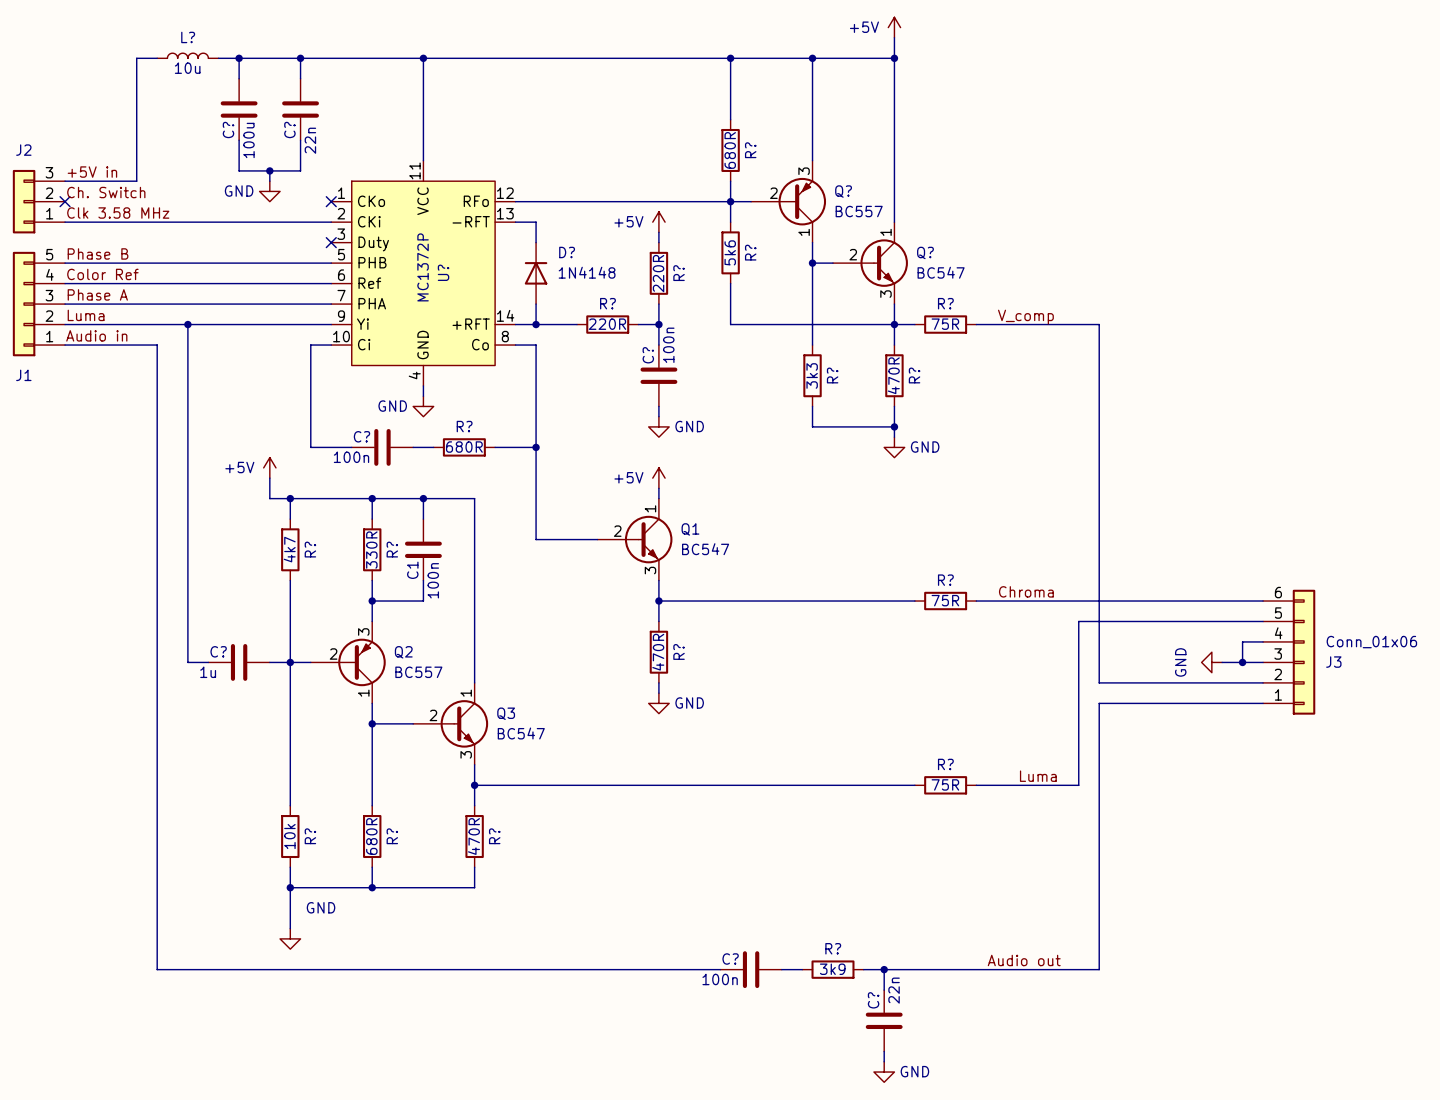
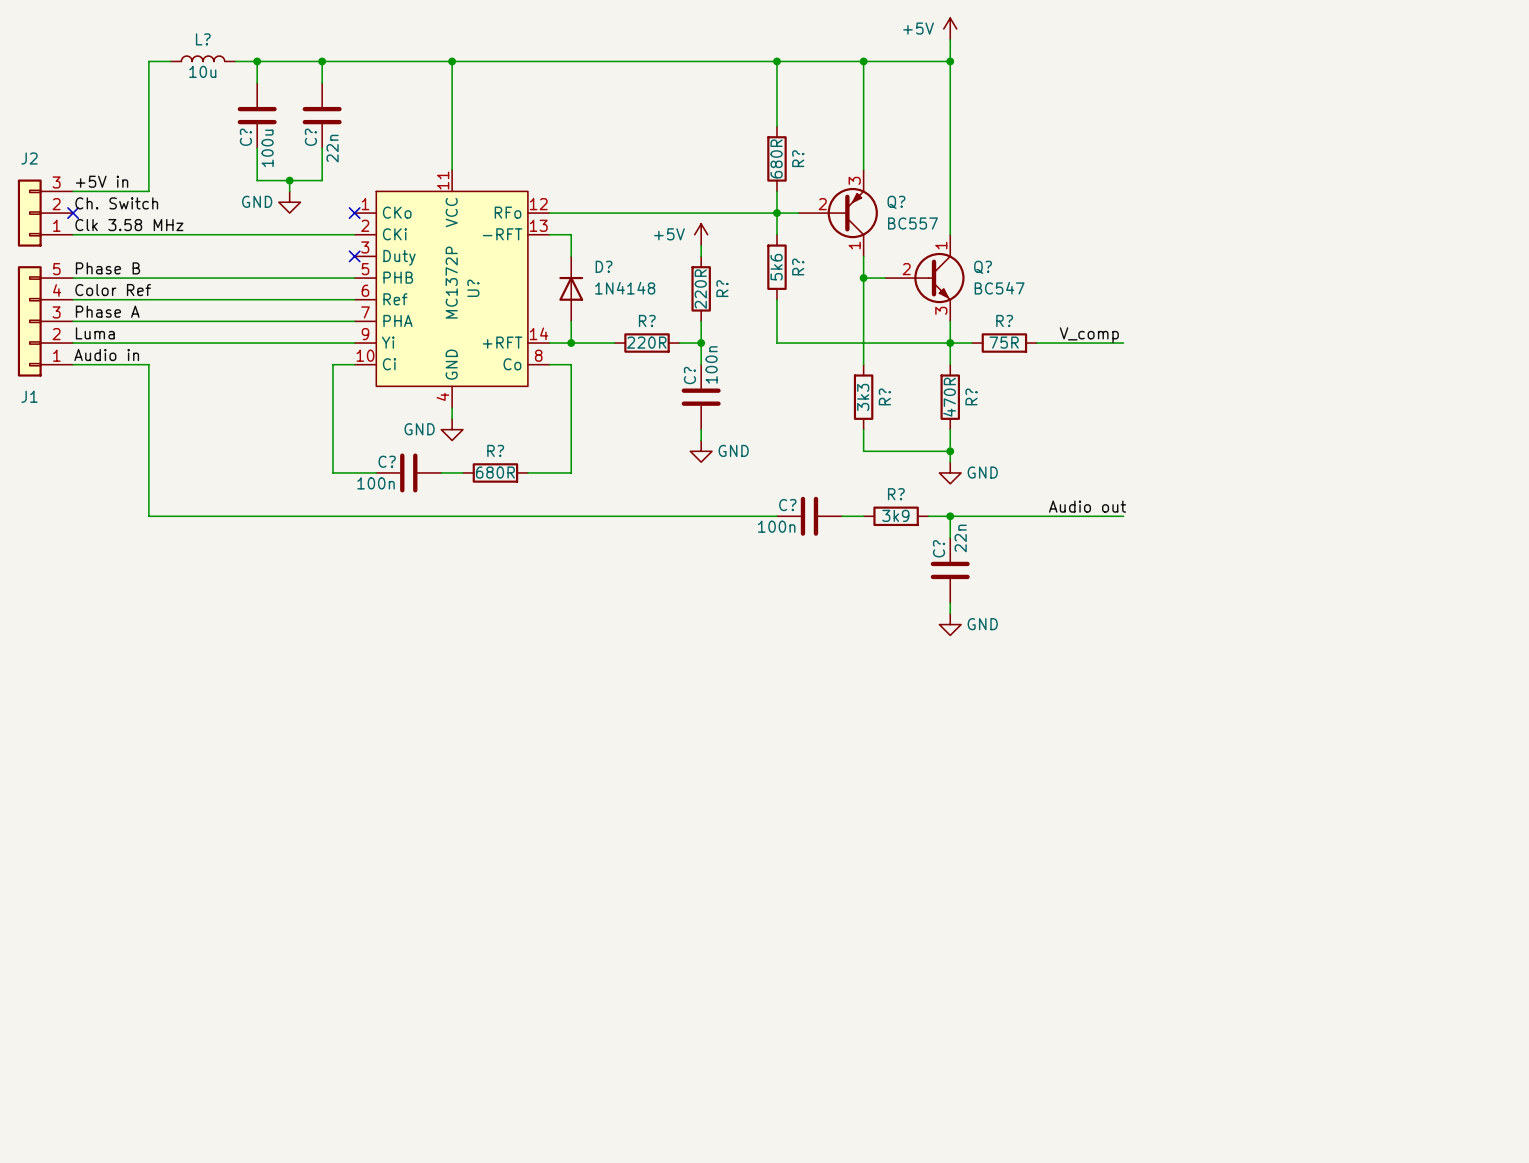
wire: (187, 324) (187, 662) (208, 662) -> none
junction: (187, 324) -> none
wire: (1058, 324) (1099, 324) (1099, 682) (1263, 682) -> none
wire: (136, 345) (157, 345) (157, 969) (720, 969) -> (148, 364) (148, 516) (776, 516)
wire: (536, 447) (536, 539) (597, 539) -> none
junction: (536, 447) -> none
power symbol: +5V (269, 467) -> none
wire: (269, 478) (269, 498) (474, 498) (474, 682) -> none
power symbol: +5V (658, 478) -> none
label: none -> Audio out (1087, 506)
wire: (658, 488) (658, 498) -> none
C?: none -> 100n (809, 516)
wire: none -> (841, 516) (863, 516)
R?: none -> 3k9 (896, 516)
wire: none -> (928, 516) (1123, 516)
wire: none -> (950, 516) (950, 537)
junction: none -> (950, 516)
wire: (290, 498) (290, 519) -> none
junction: (290, 498) -> none
wire: (372, 498) (372, 519) -> none
junction: (372, 498) -> none
wire: (423, 498) (423, 519) -> none
junction: (423, 498) -> none
Q1: BC547 (634, 539) -> none
C?: none -> 22n (950, 570)
R?: 4k7 (290, 549) -> none
R?: 330R (372, 549) -> none
C1: 100n (423, 549) -> none
wire: none -> (950, 602) (950, 613)
wire: (290, 580) (290, 805) -> none
wire: (372, 580) (372, 621) -> none
wire: (423, 580) (423, 601) (372, 601) -> none
wire: (658, 580) (658, 621) -> none
power symbol: none -> GND (950, 624)
label: Chroma (1026, 591) -> none
junction: (372, 601) -> none
wire: (658, 601) (914, 601) -> none
junction: (658, 601) -> none
R?: 75R (945, 601) -> none
wire: (976, 601) (1263, 601) -> none
wire: (1263, 621) (1078, 621) (1078, 785) (976, 785) -> none
wire: (1263, 641) (1242, 641) (1242, 662) -> none
R?: 470R (658, 652) -> none
J3: Conn_01x06 (1289, 652) -> none
C?: 1u (239, 662) -> none
wire: (269, 662) (310, 662) -> none
junction: (290, 662) -> none
Q2: BC557 (348, 662) -> none
power symbol: GND (1211, 662) -> none
wire: (1222, 662) (1263, 662) -> none
junction: (1242, 662) -> none
wire: (658, 682) (658, 693) -> none
wire: (372, 703) (372, 805) -> none
power symbol: GND (658, 703) -> none
wire: (1263, 703) (1099, 703) (1099, 969) (863, 969) -> none
wire: (372, 723) (413, 723) -> none
junction: (372, 723) -> none
Q3: BC547 (450, 723) -> none
wire: (474, 764) (474, 805) -> none
label: Luma (1038, 776) -> none
wire: (474, 785) (914, 785) -> none
junction: (474, 785) -> none
R?: 75R (945, 785) -> none
R?: 10k (290, 836) -> none
R?: 680R (372, 836) -> none
R?: 470R (474, 836) -> none
wire: (290, 867) (290, 928) -> none
wire: (372, 867) (372, 887) -> none
wire: (474, 867) (474, 887) (290, 887) -> none
junction: (290, 887) -> none
junction: (372, 887) -> none
power symbol: GND (290, 938) -> none
label: Audio out (1024, 960) -> none
C?: 100n (751, 969) -> none
wire: (781, 969) (802, 969) -> none
R?: 3k9 (833, 969) -> none
wire: (884, 969) (884, 990) -> none
junction: (884, 969) -> none
C?: 22n (884, 1020) -> none
wire: (884, 1051) (884, 1061) -> none
power symbol: GND (884, 1072) -> none

